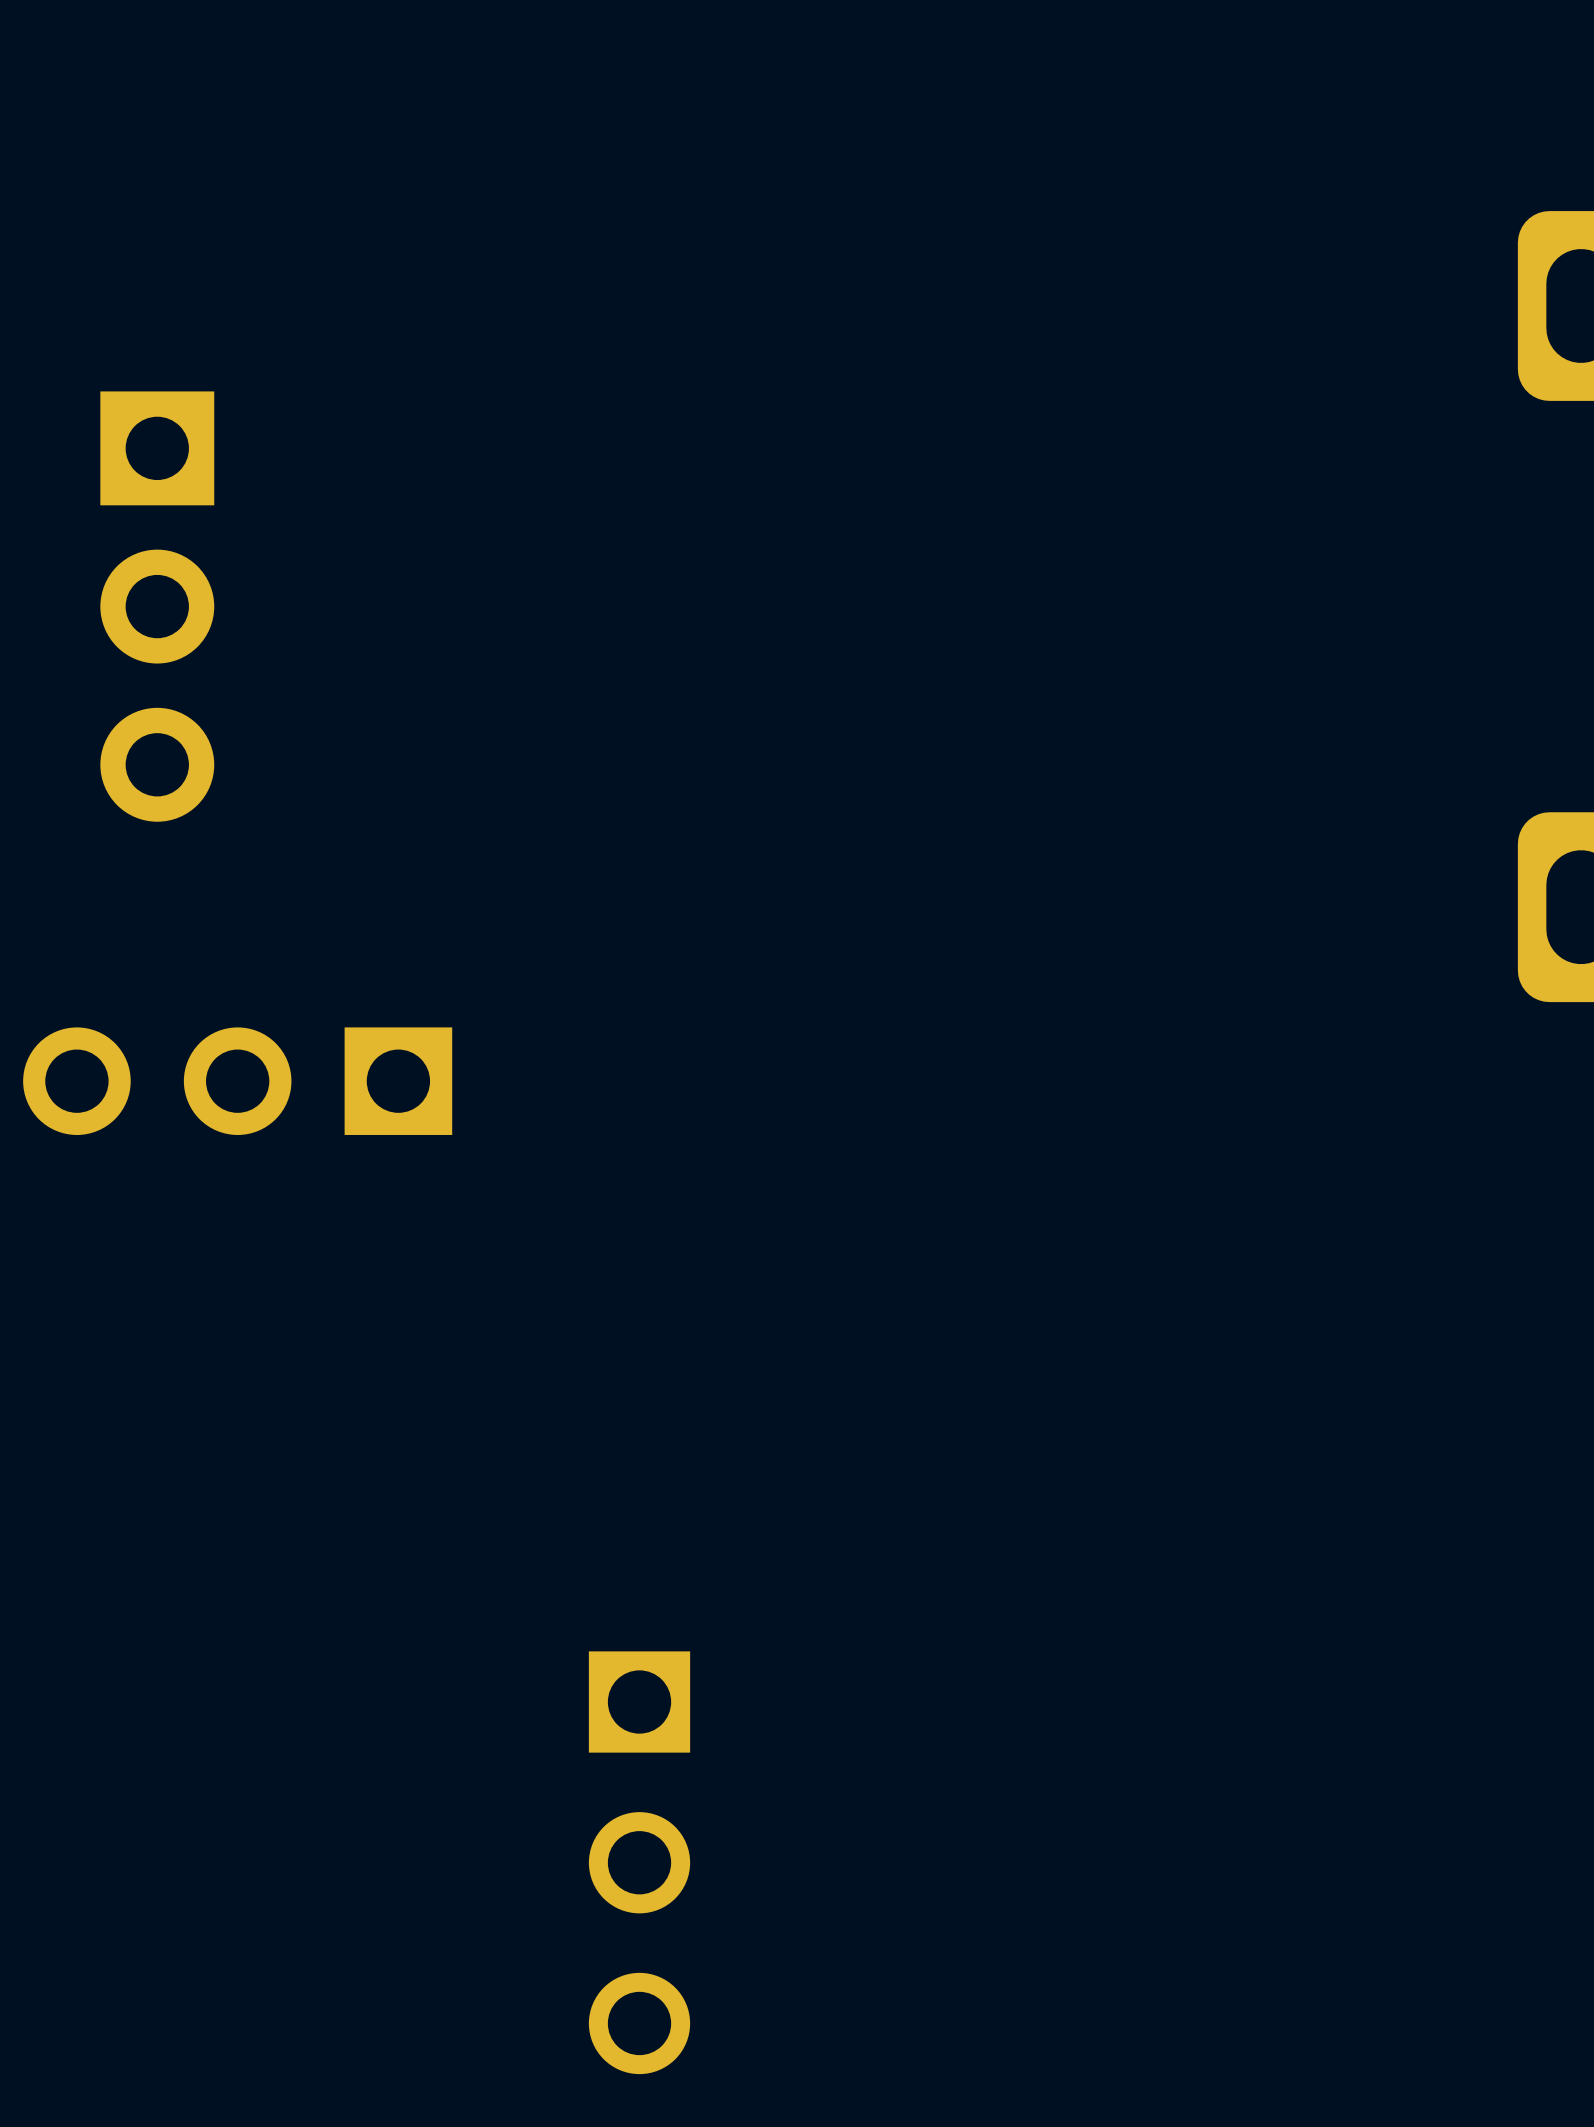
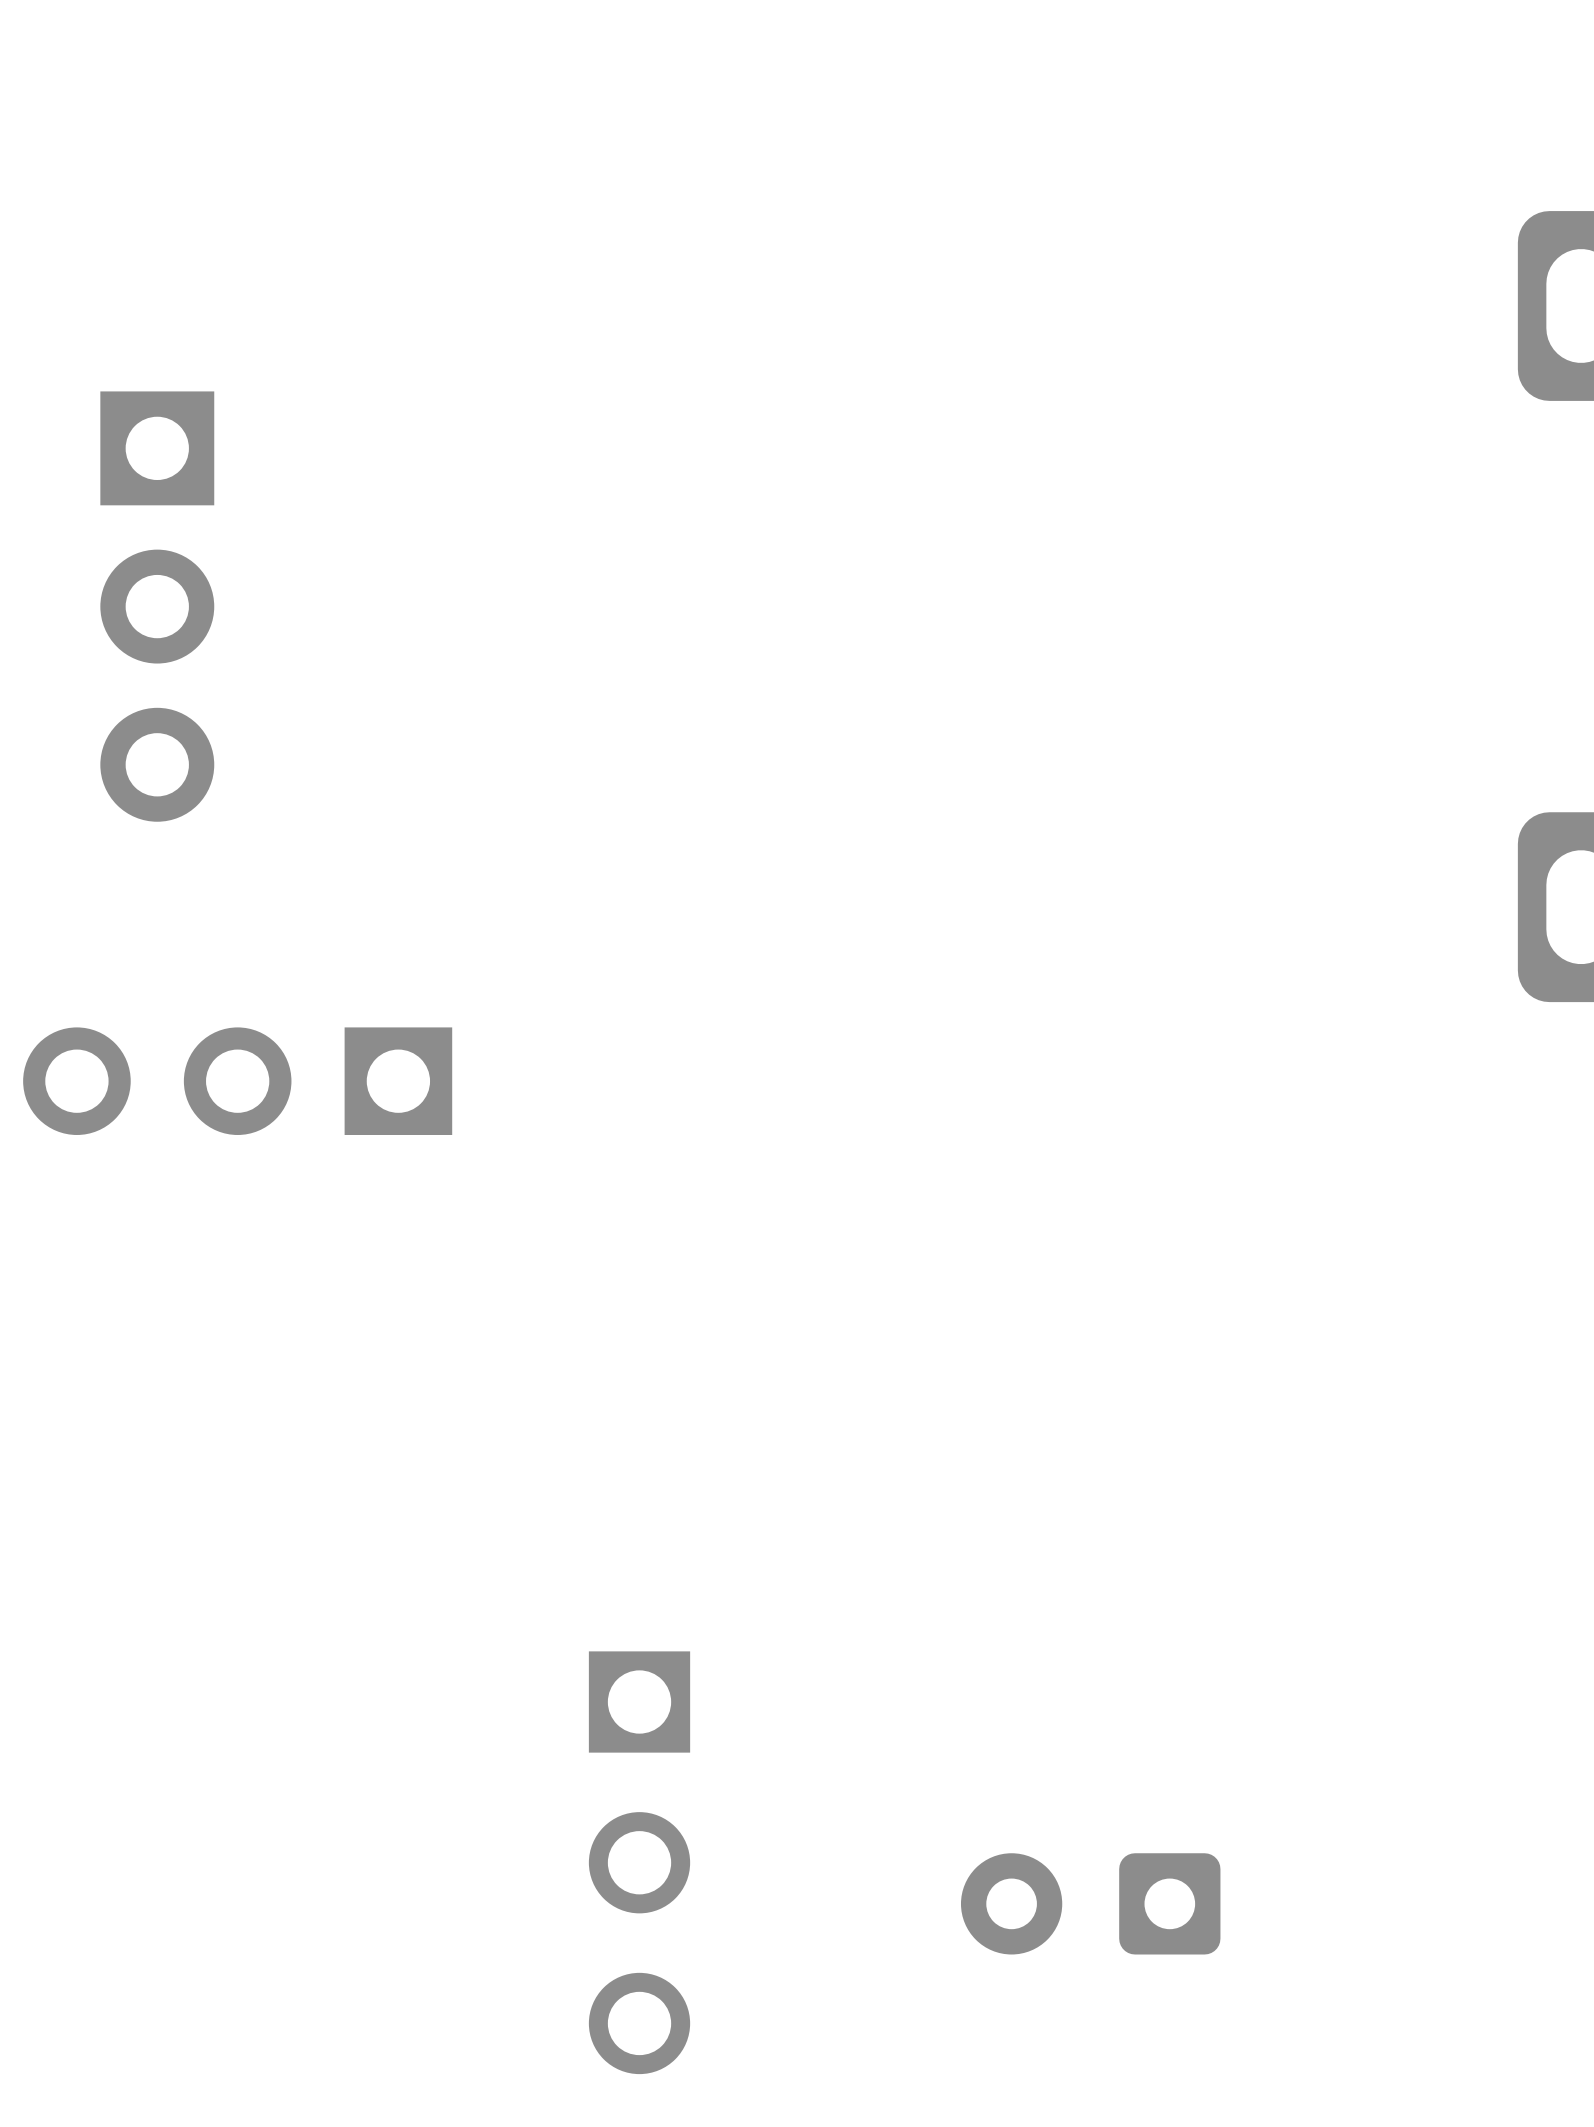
part: none -> (1090, 1903)

